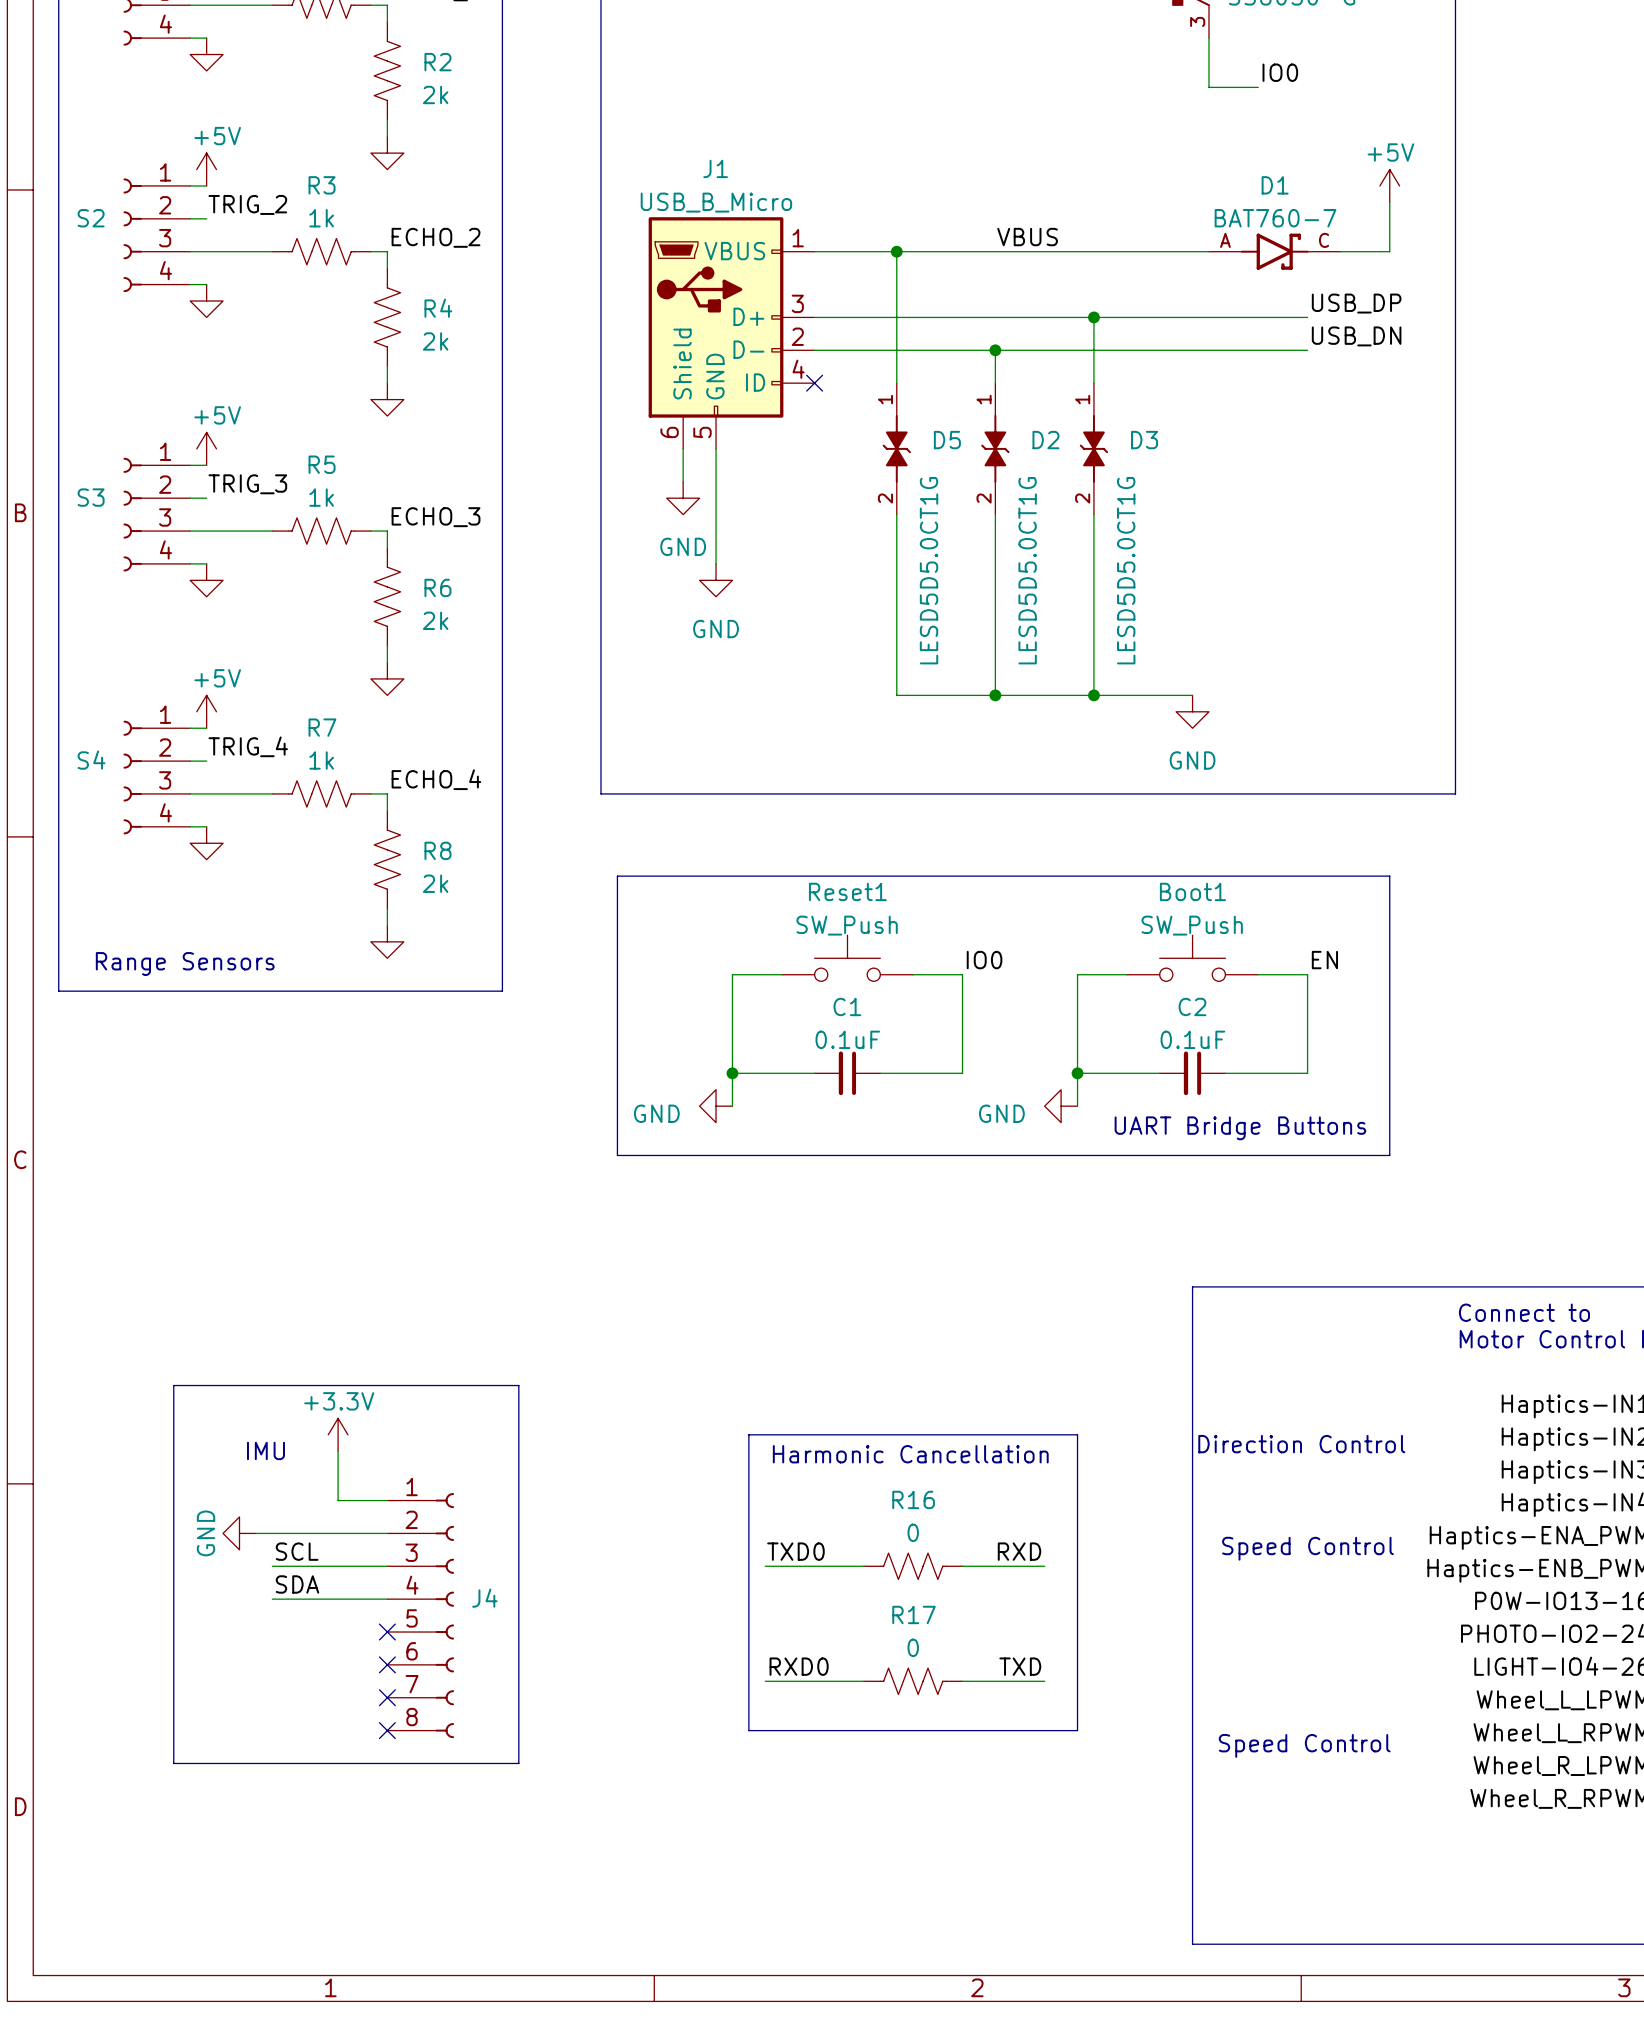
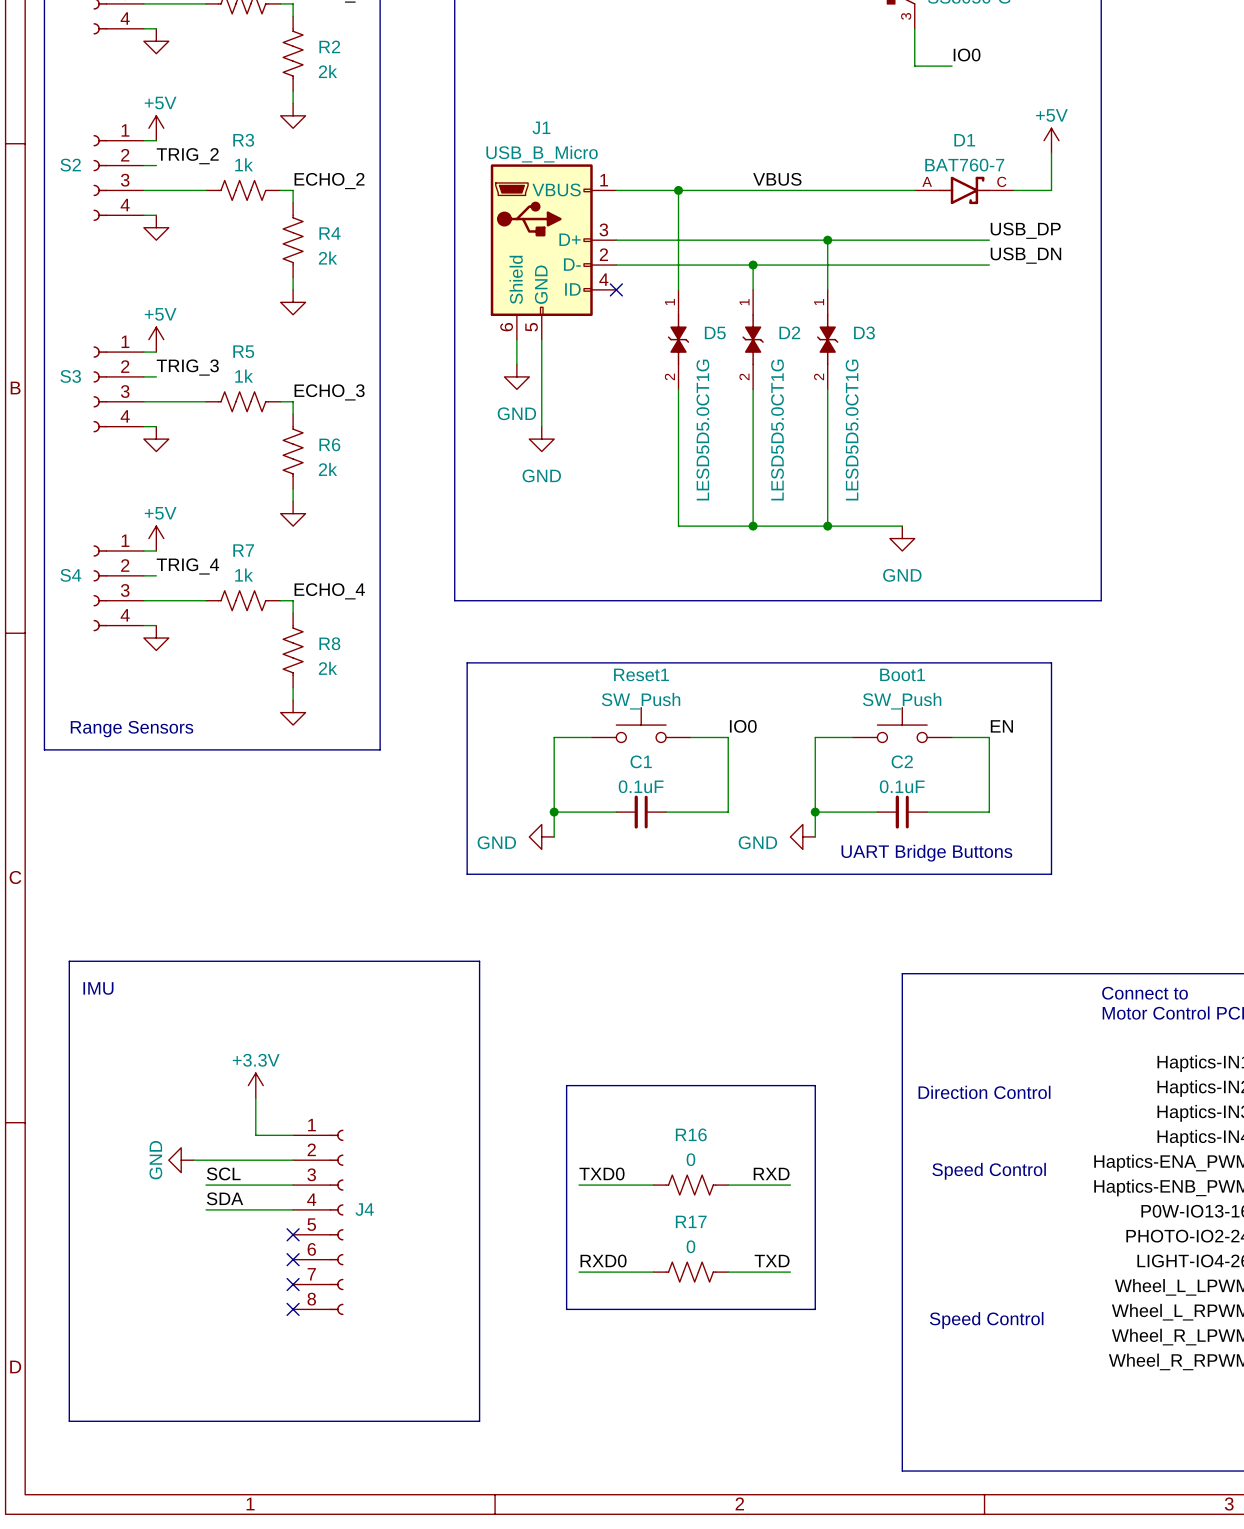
line: none -> (69, 961) (479, 961) (479, 1421) (69, 1421) (69, 961)
line: (173, 1385) (518, 1385) (518, 1763) (173, 1763) (173, 1385) -> none
text position: IMU (265, 1450) -> IMU (98, 988)
text: Harmonic Cancellation (910, 1454) -> none

